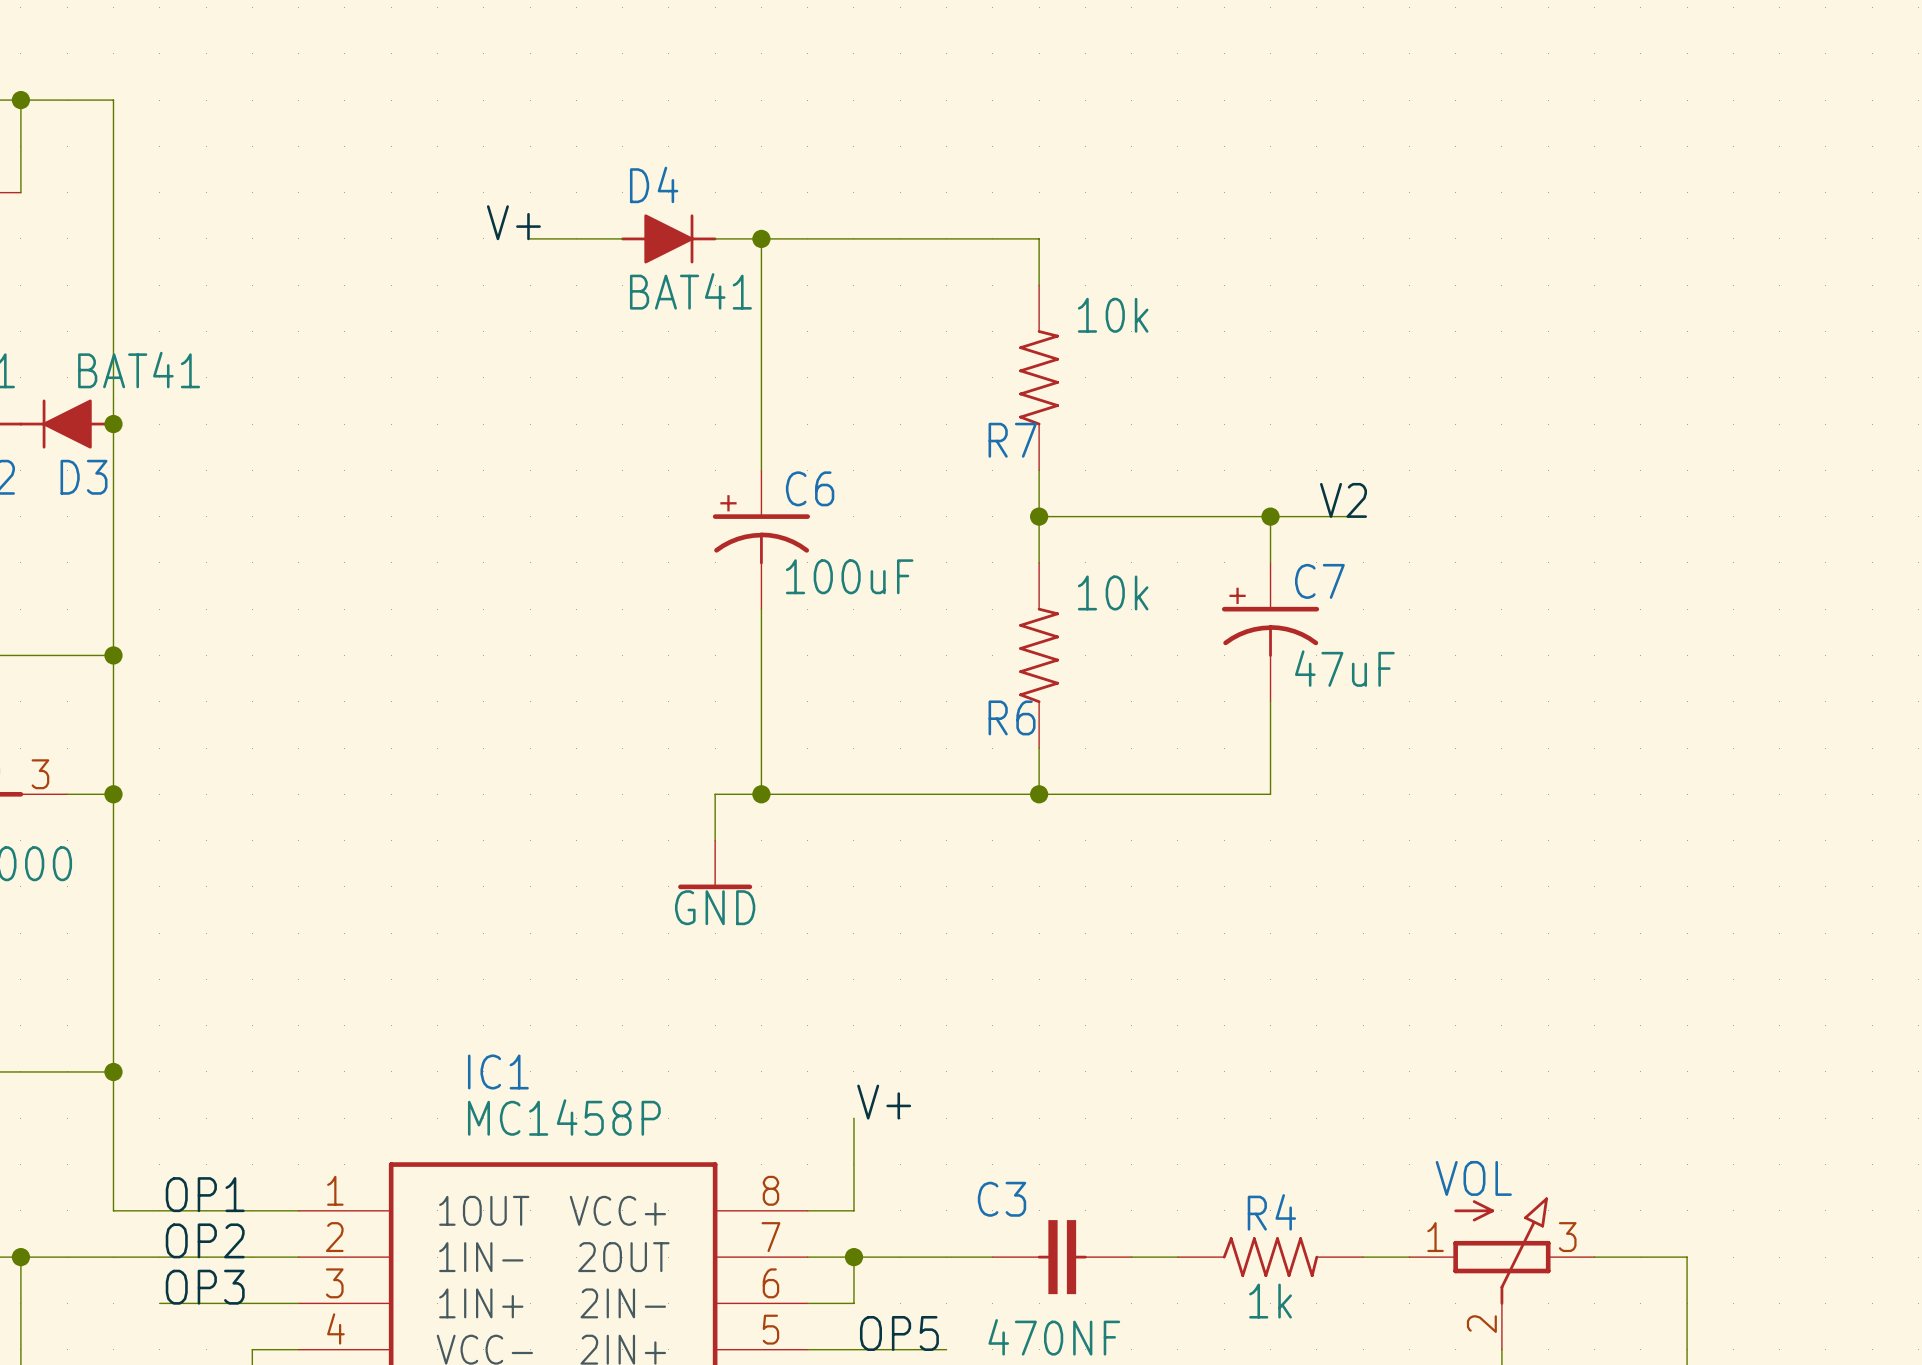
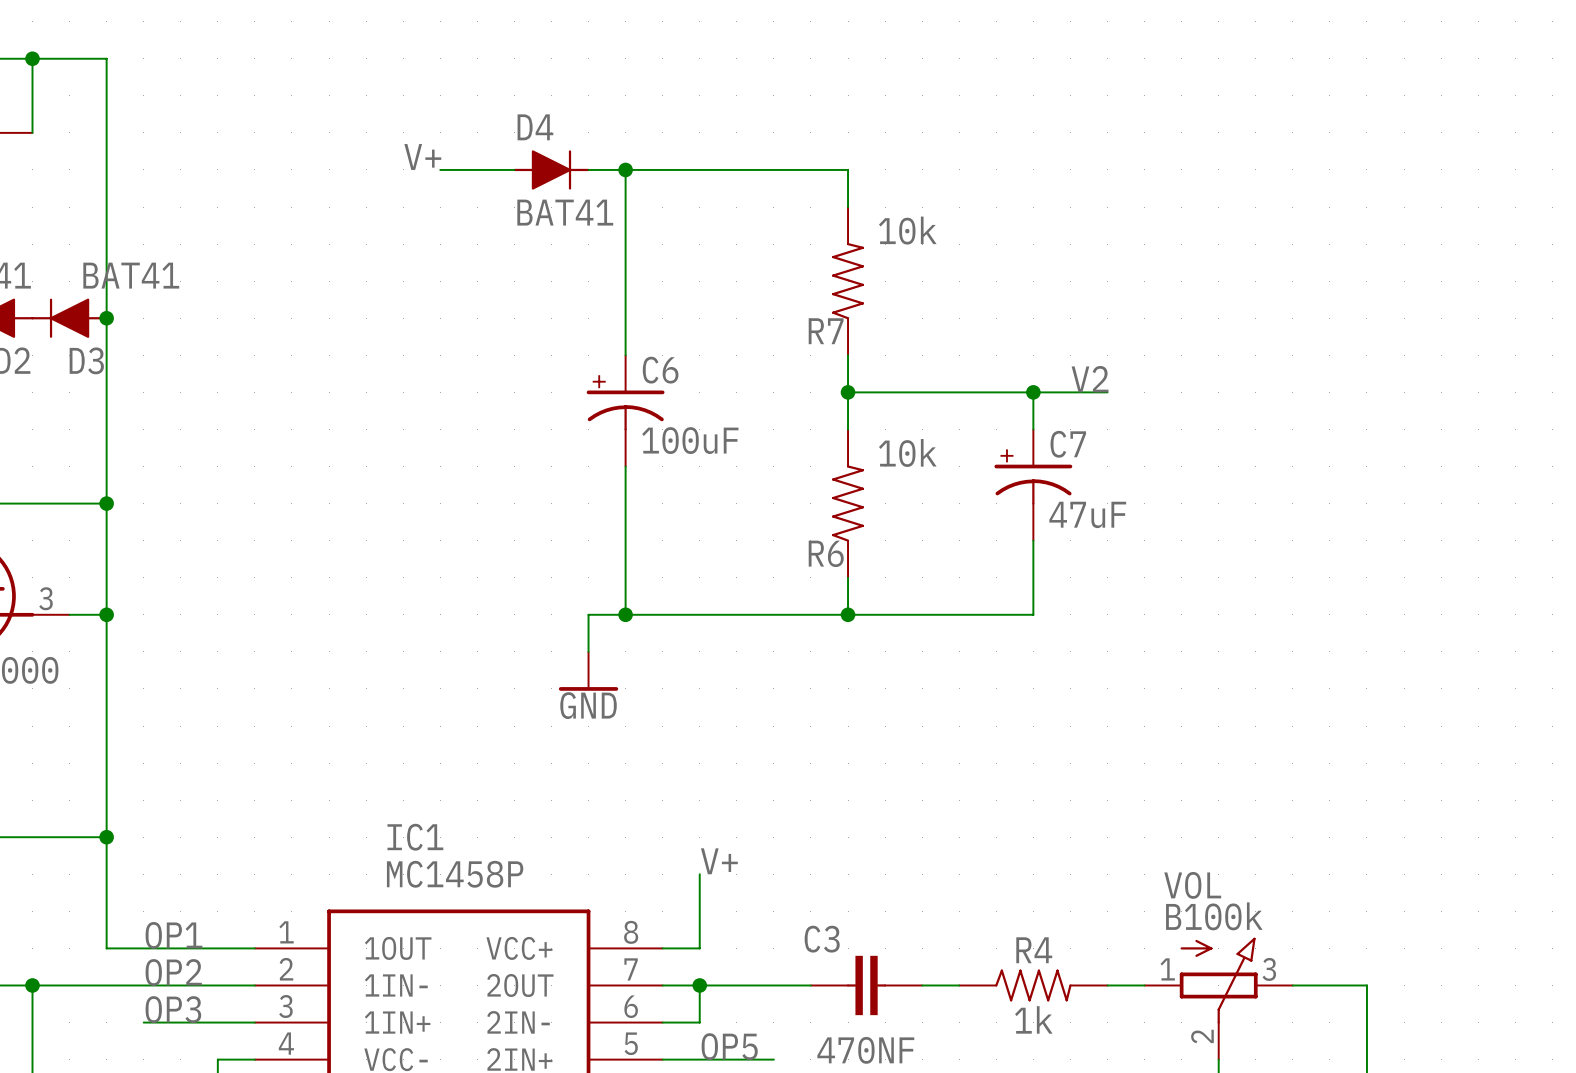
VOL value: none -> B100k (1214, 916)
VOL name position: VOL (1473, 1178) -> VOL (1192, 885)

